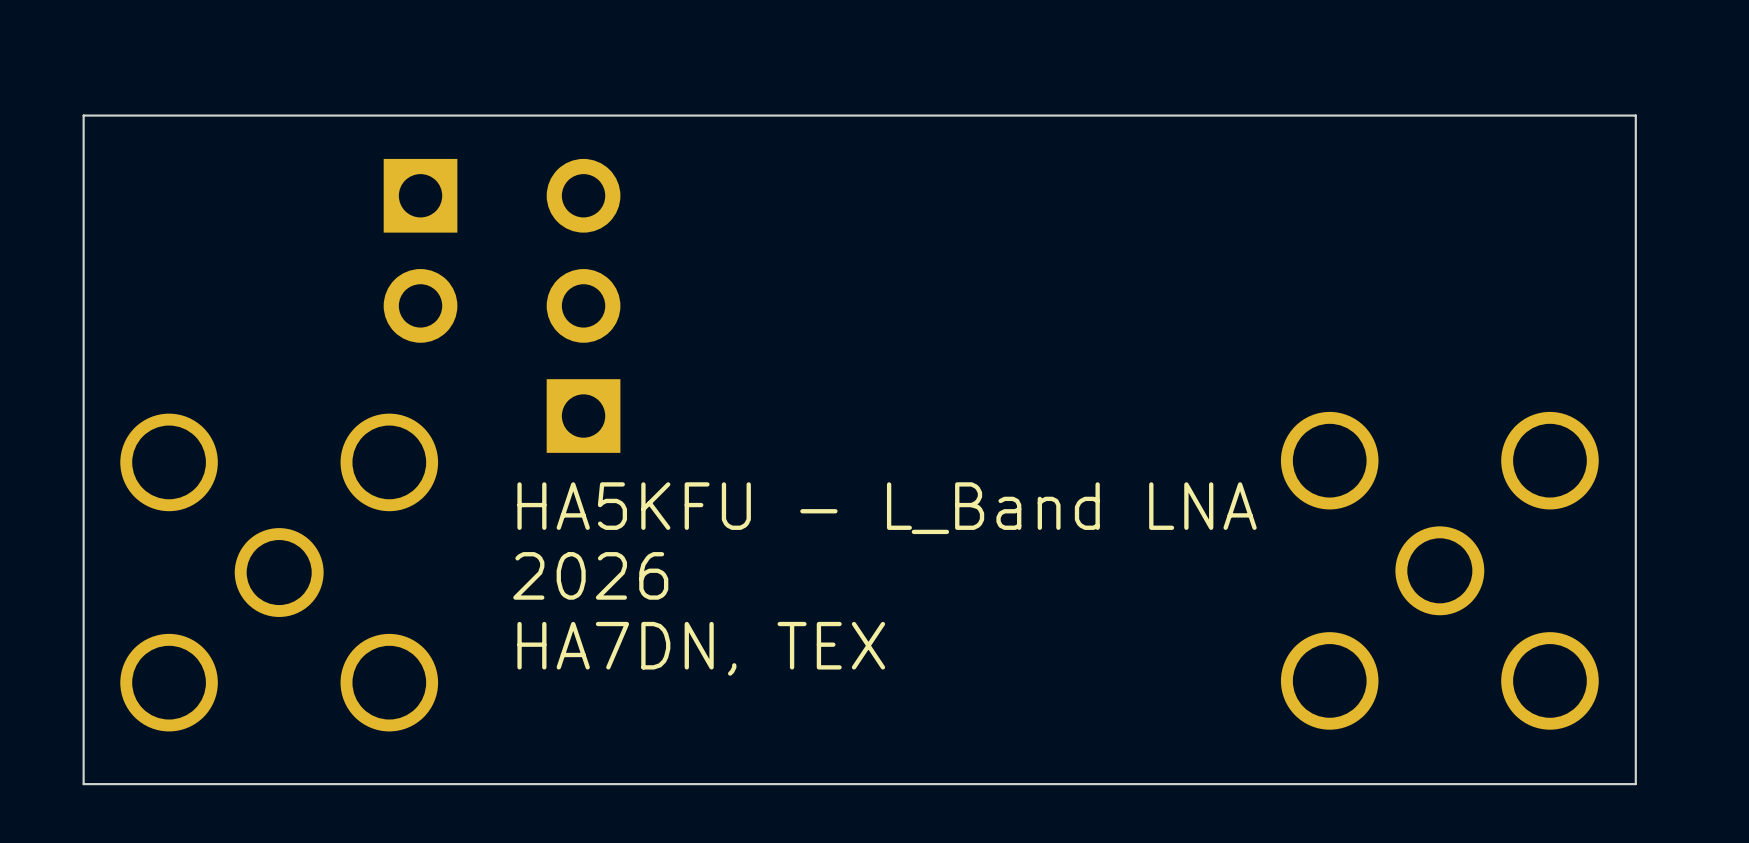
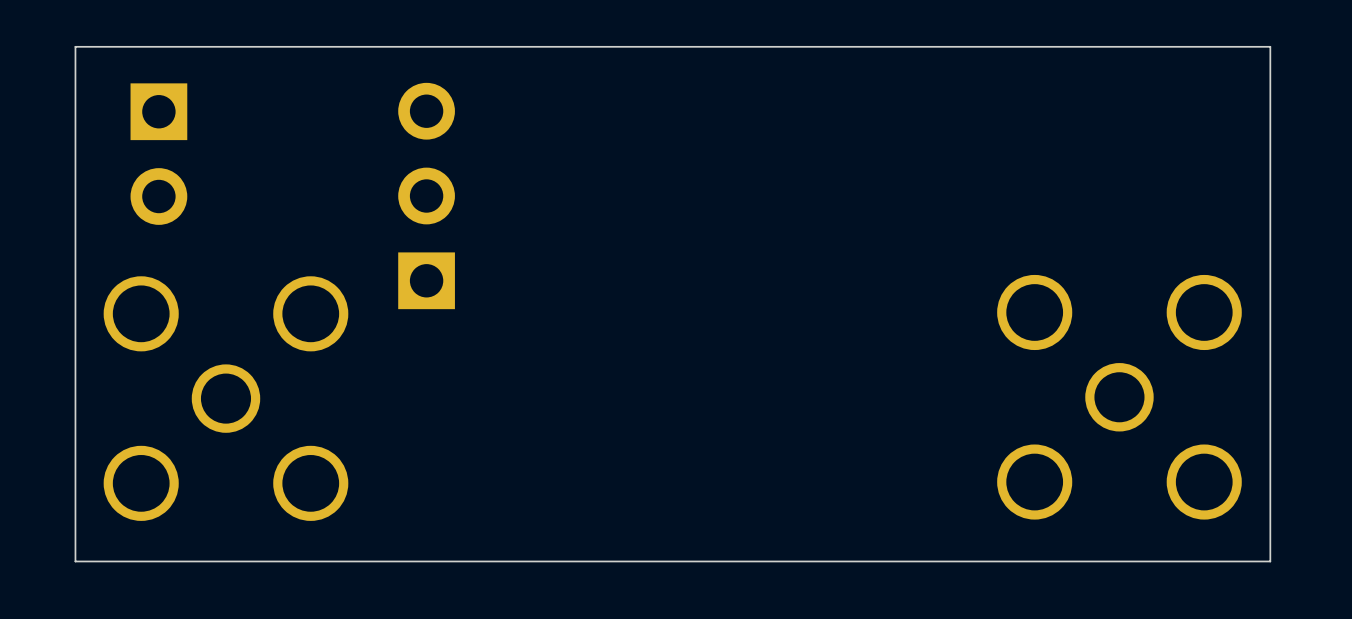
part position: (420, 250) -> (158, 154)
part position: (583, 305) -> (426, 196)
text: HA5KFU - L_Band LNA (887, 508) -> none
text: 2026 (590, 575) -> none
text: HA7DN, TEX (701, 648) -> none

